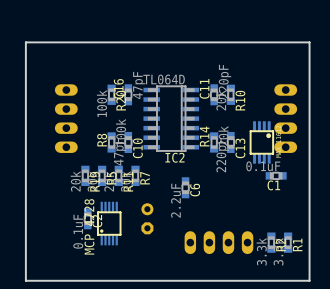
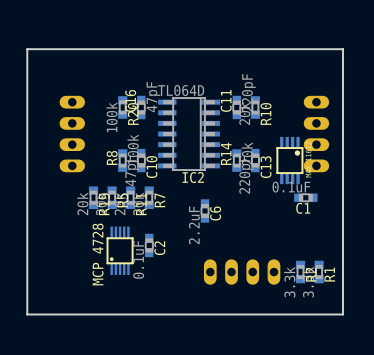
C2 position: (87, 218) -> (149, 245)
part: (147, 218) -> none

